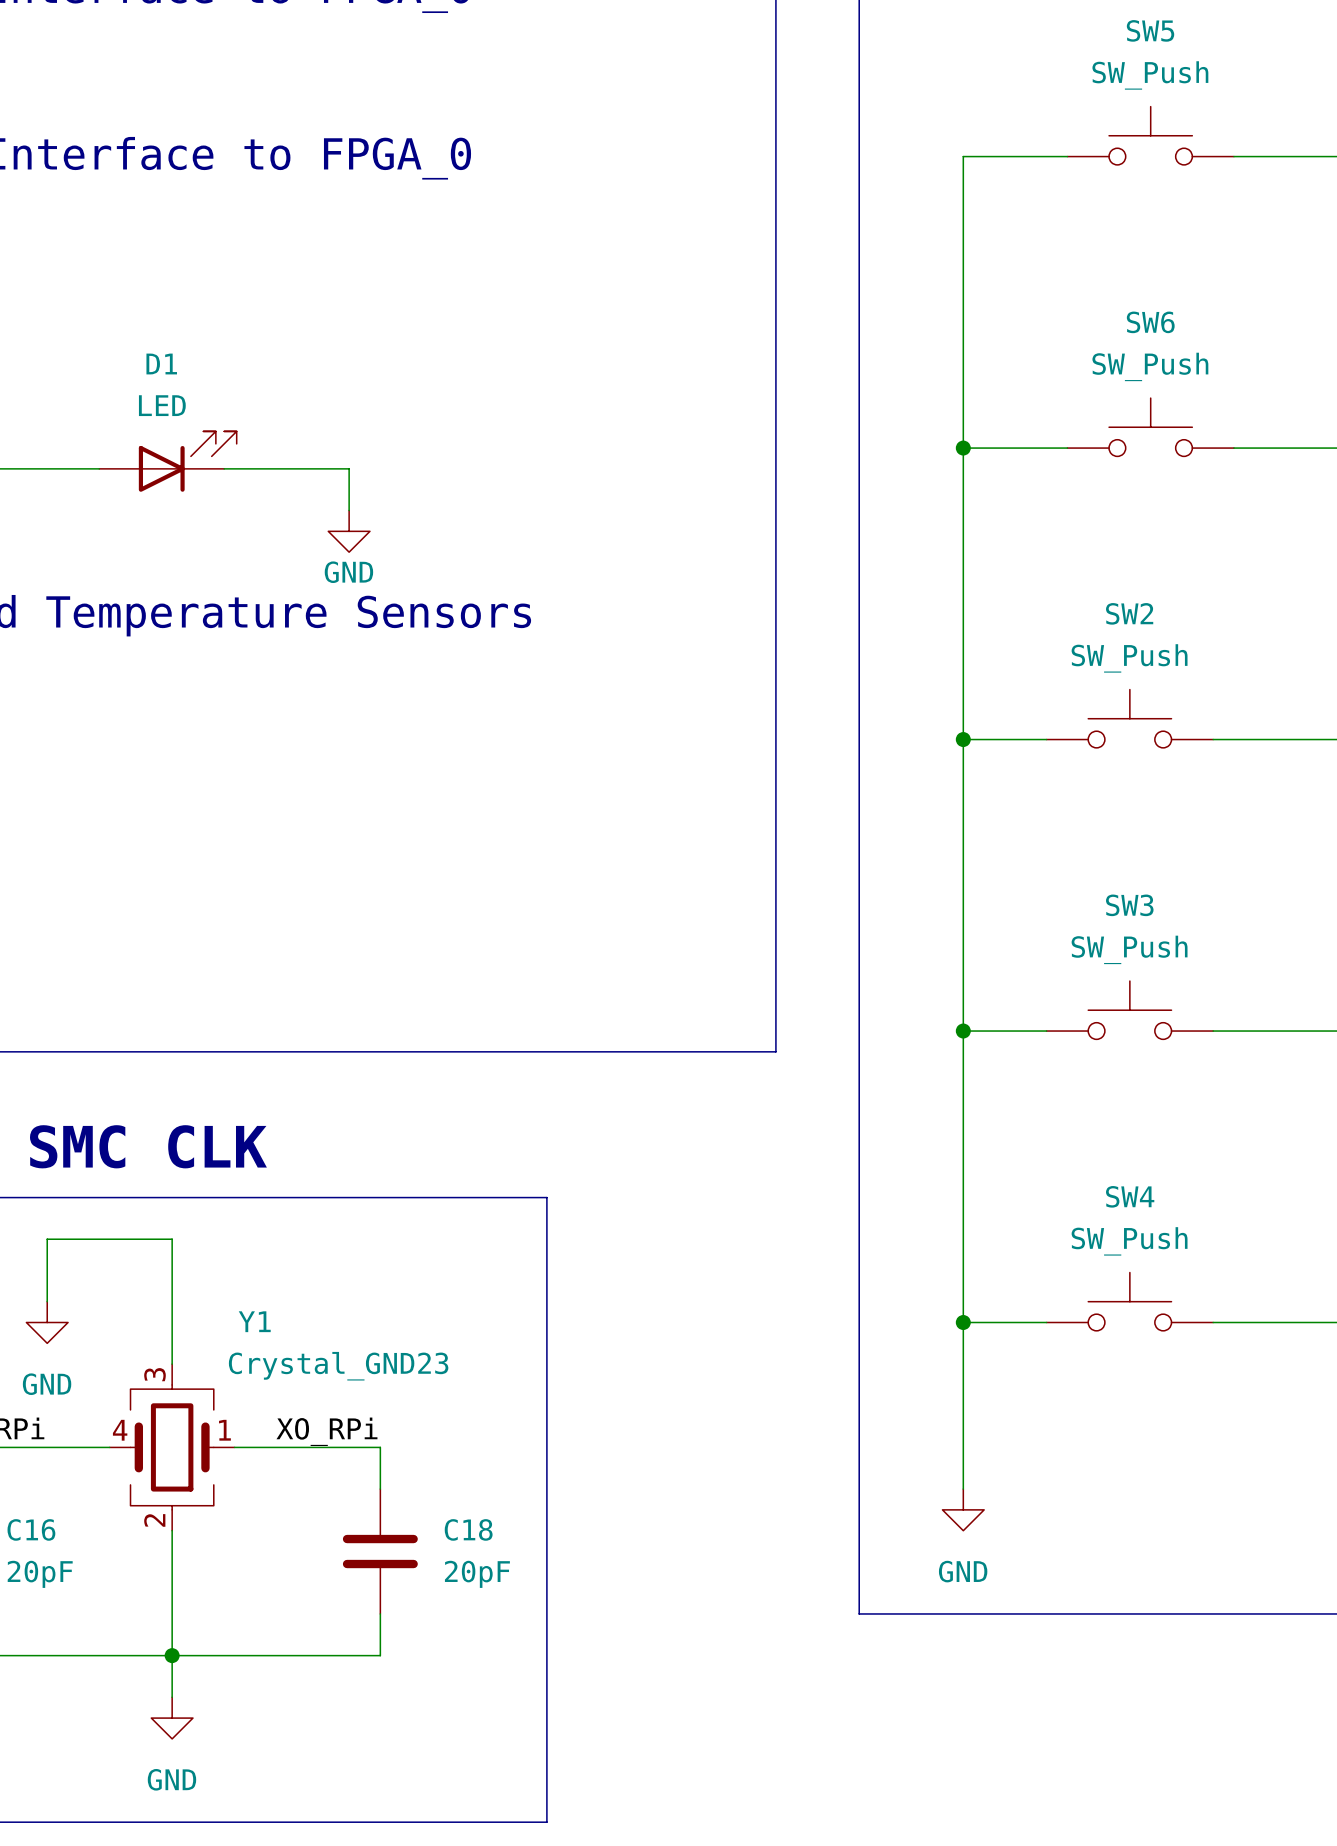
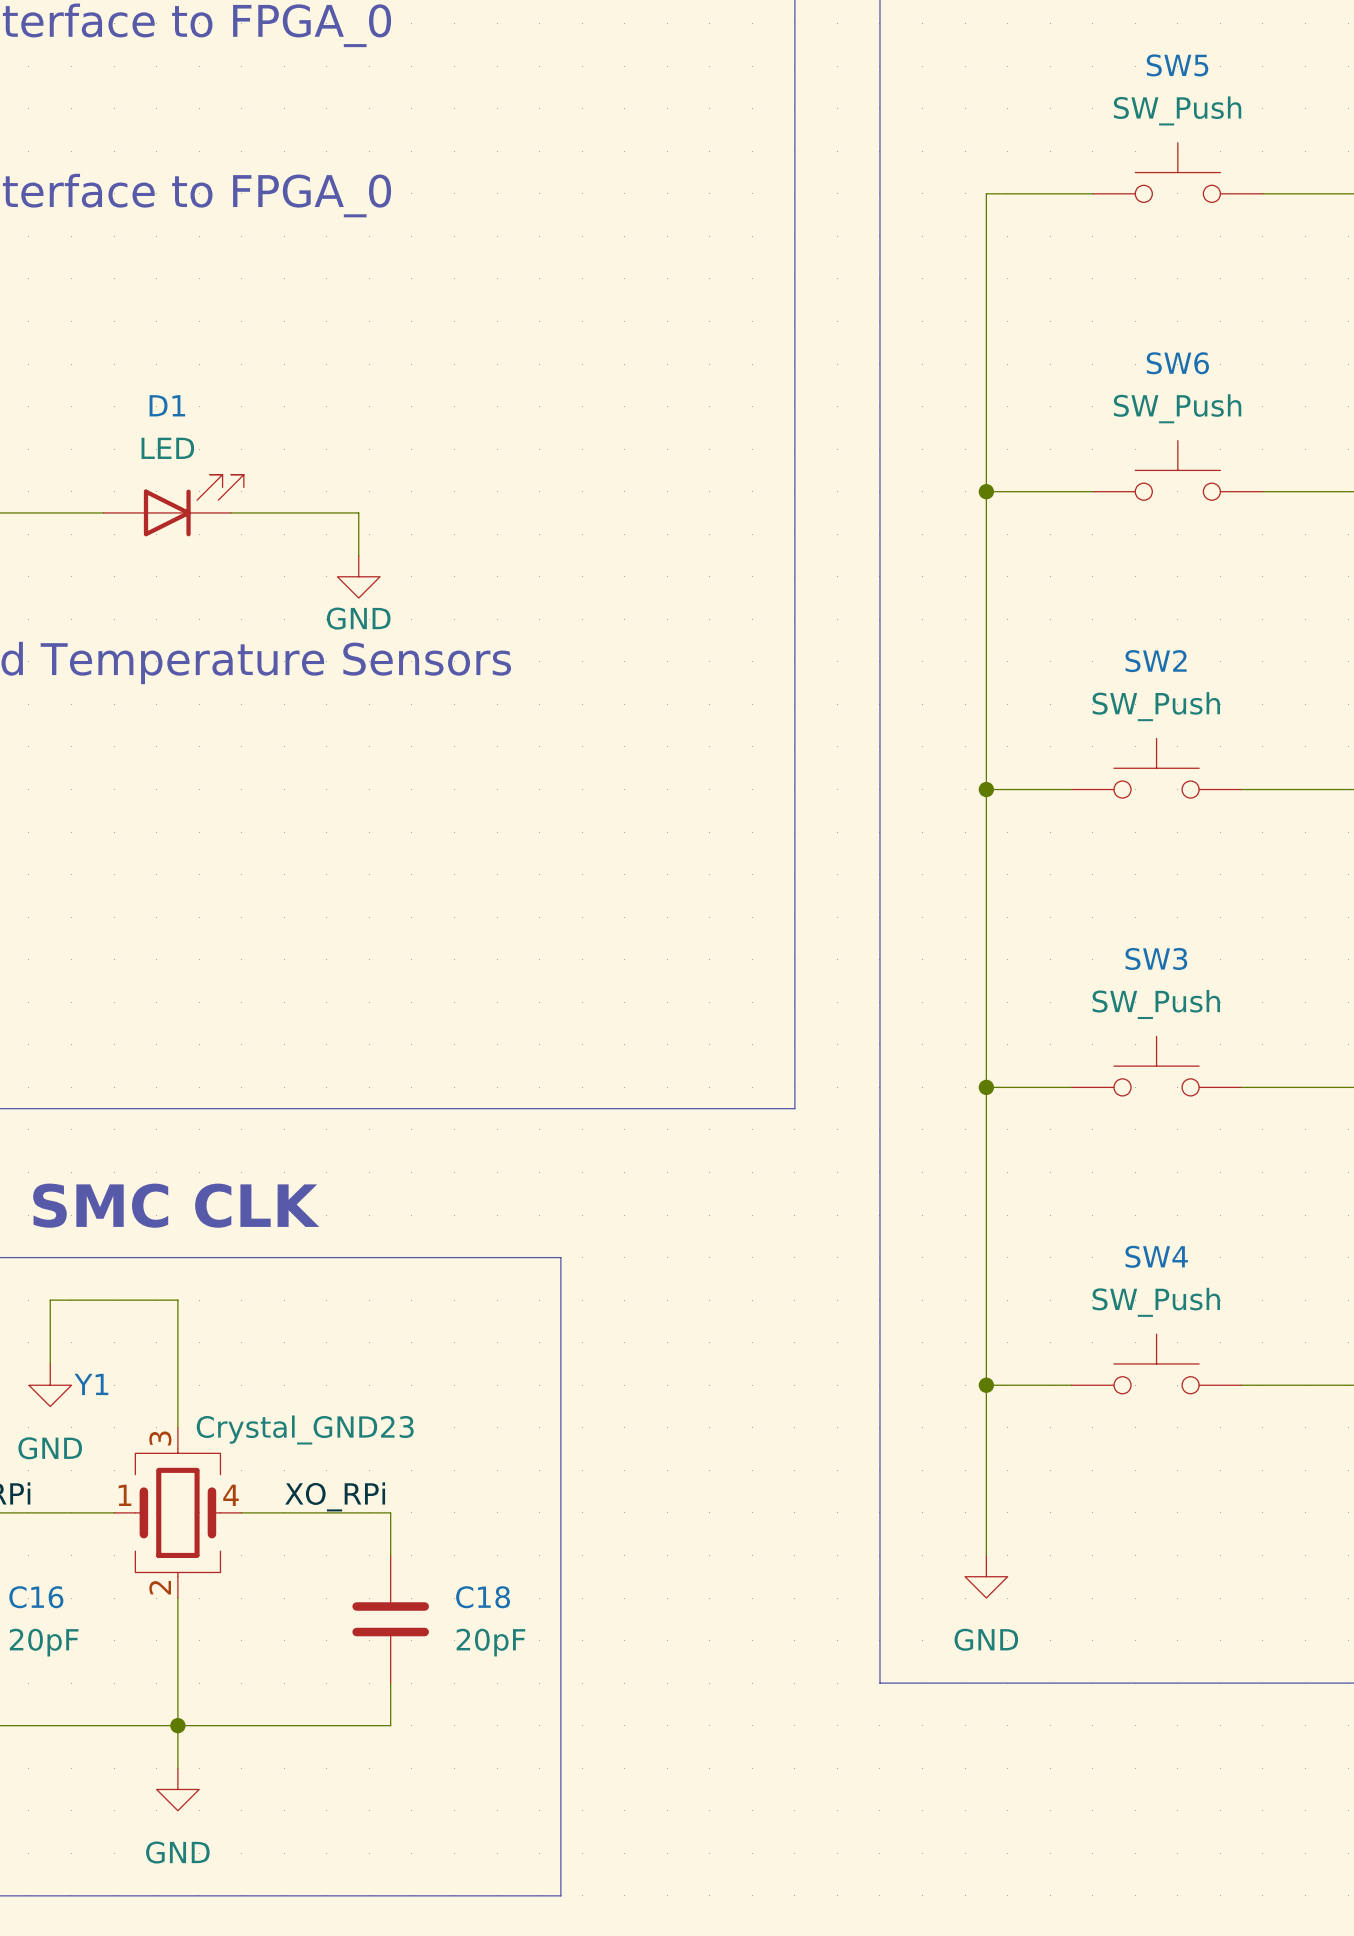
Y1 value position: Crystal_GND23 (338, 1366) -> Crystal_GND23 (305, 1429)
Y1 flip: as is (172, 1447) -> left-right (177, 1512)

